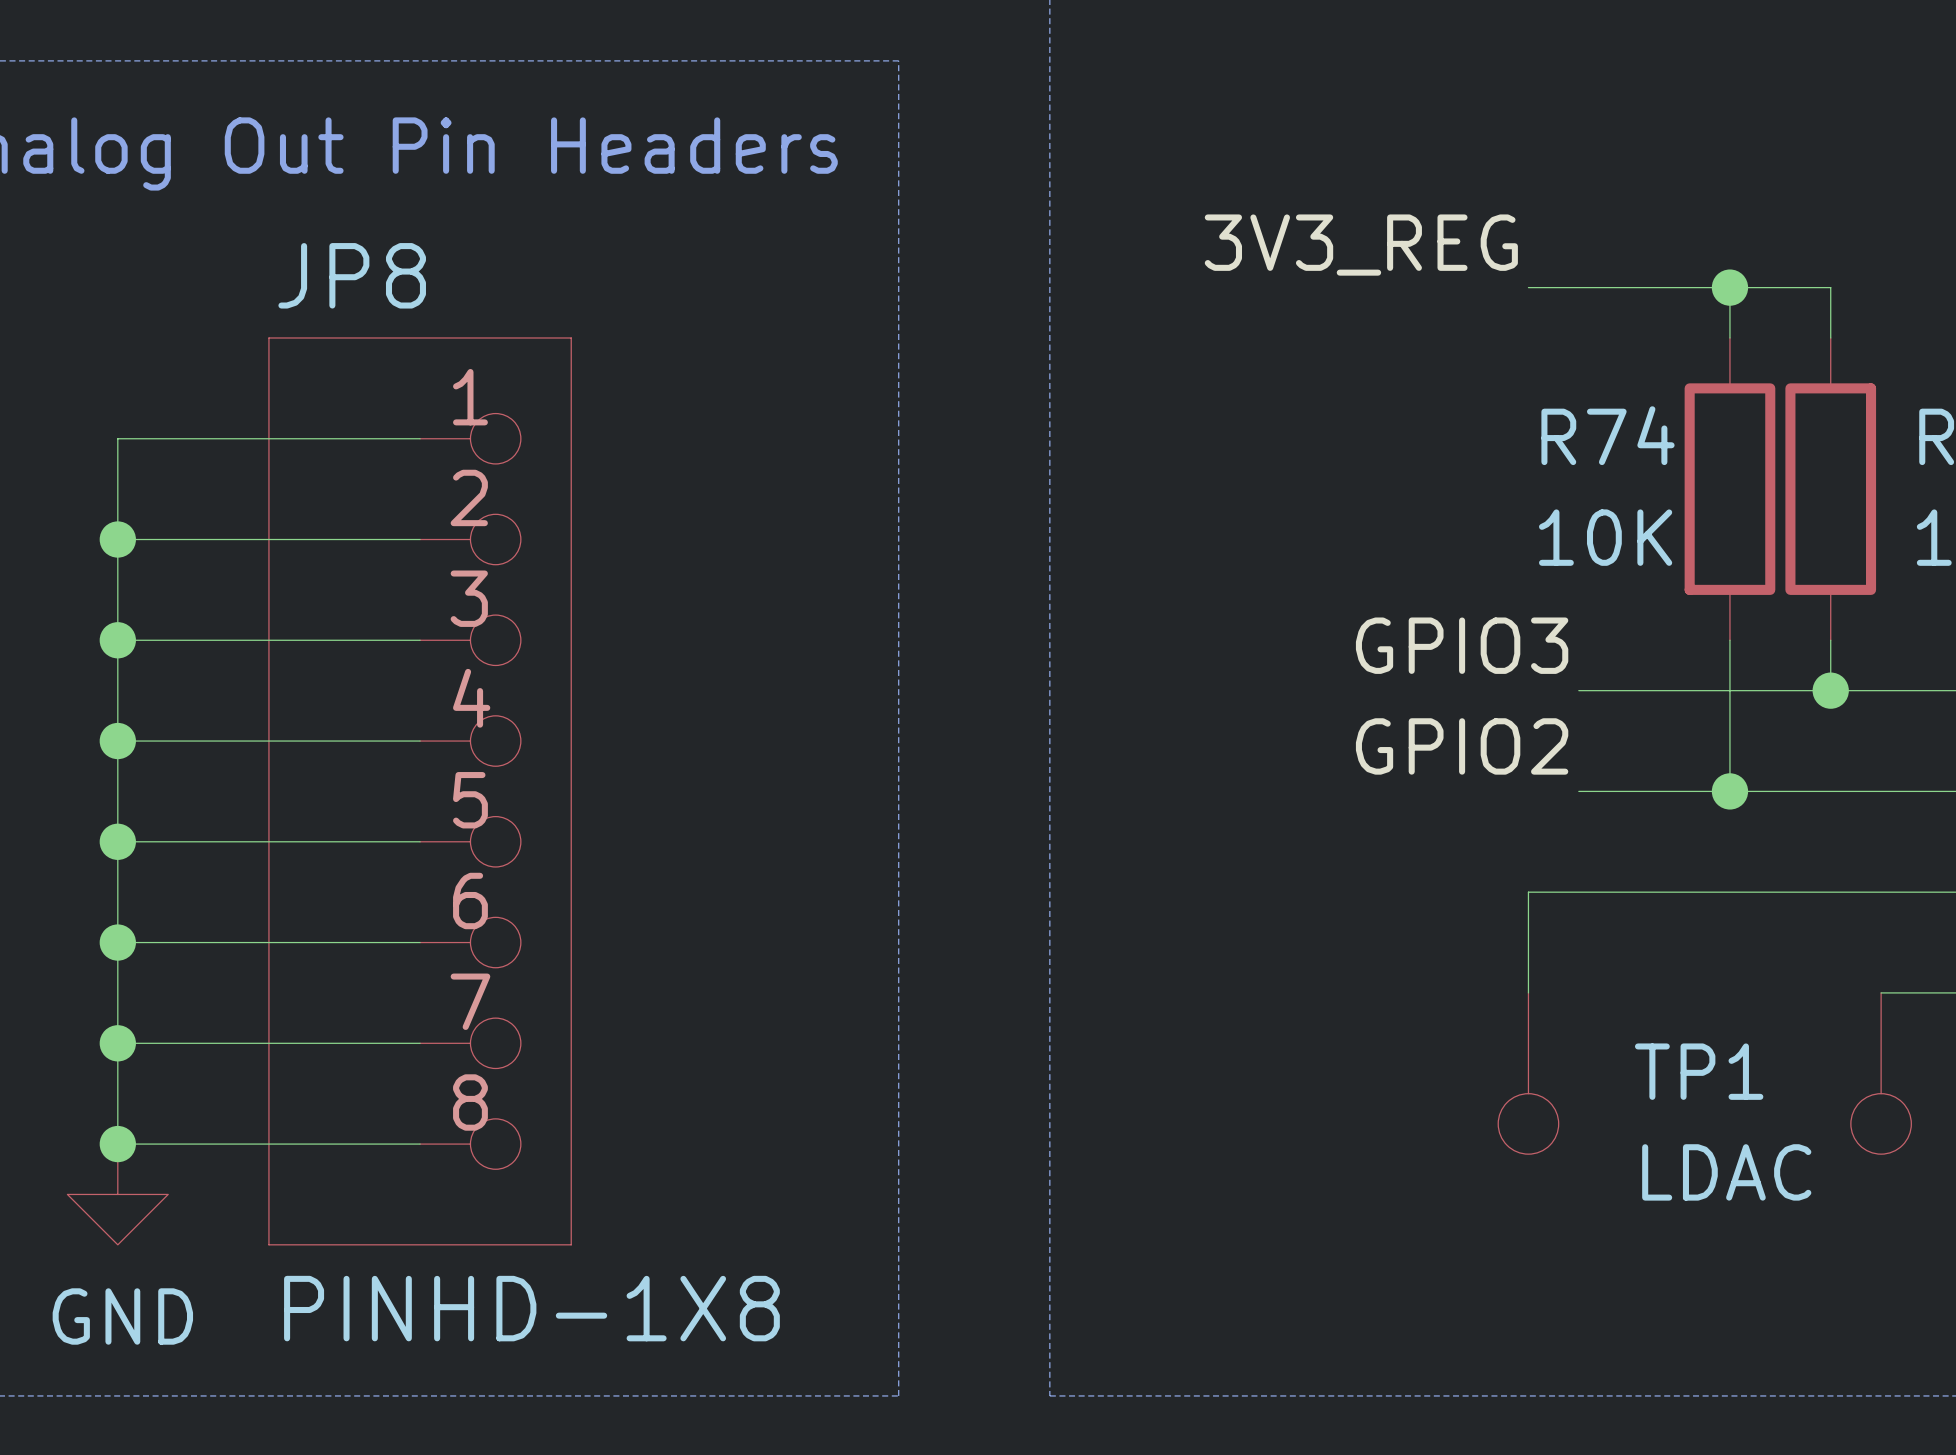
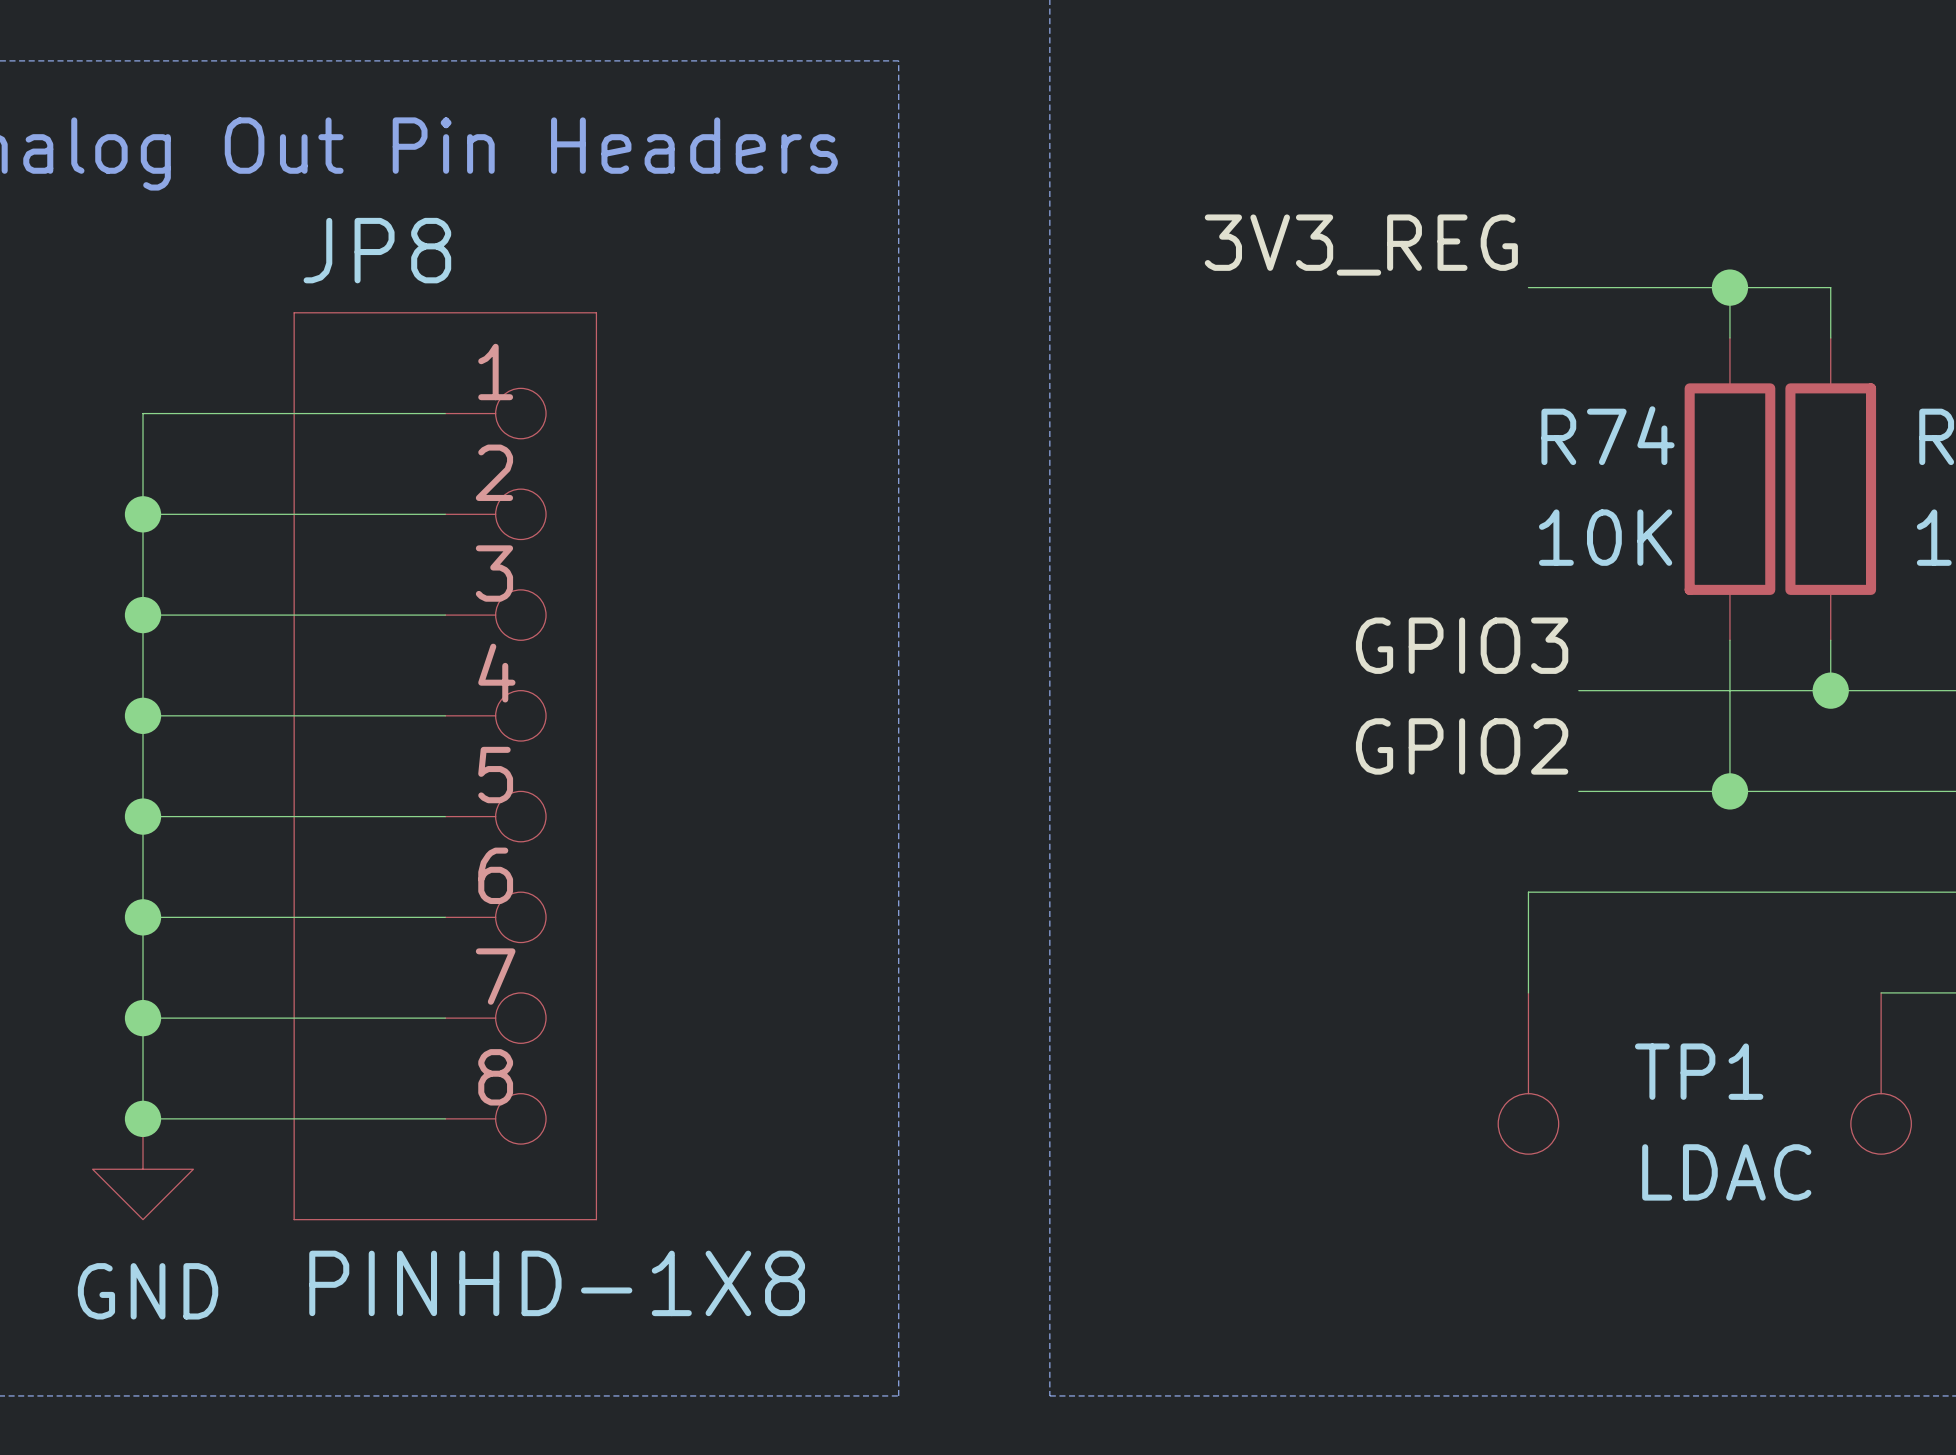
wire: (420, 438) (117, 438) (117, 1144) (420, 1144) -> (445, 413) (143, 413) (143, 1118) (445, 1118)
wire: (117, 539) (420, 539) -> (143, 514) (445, 514)
junction position: (117, 539) -> (143, 514)
wire: (117, 640) (420, 640) -> (143, 615) (445, 615)
junction position: (117, 640) -> (143, 615)
wire: (117, 741) (420, 741) -> (143, 715) (445, 715)
junction position: (117, 741) -> (143, 715)
JP8 position: (420, 791) -> (445, 766)
wire: (117, 841) (420, 841) -> (143, 816) (445, 816)
junction position: (117, 841) -> (143, 816)
wire: (117, 942) (420, 942) -> (143, 917) (445, 917)
junction position: (117, 942) -> (143, 917)
wire: (117, 1043) (420, 1043) -> (143, 1018) (445, 1018)
junction position: (117, 1043) -> (143, 1018)
junction position: (117, 1144) -> (143, 1118)
power symbol position: GND (117, 1194) -> GND (143, 1169)

